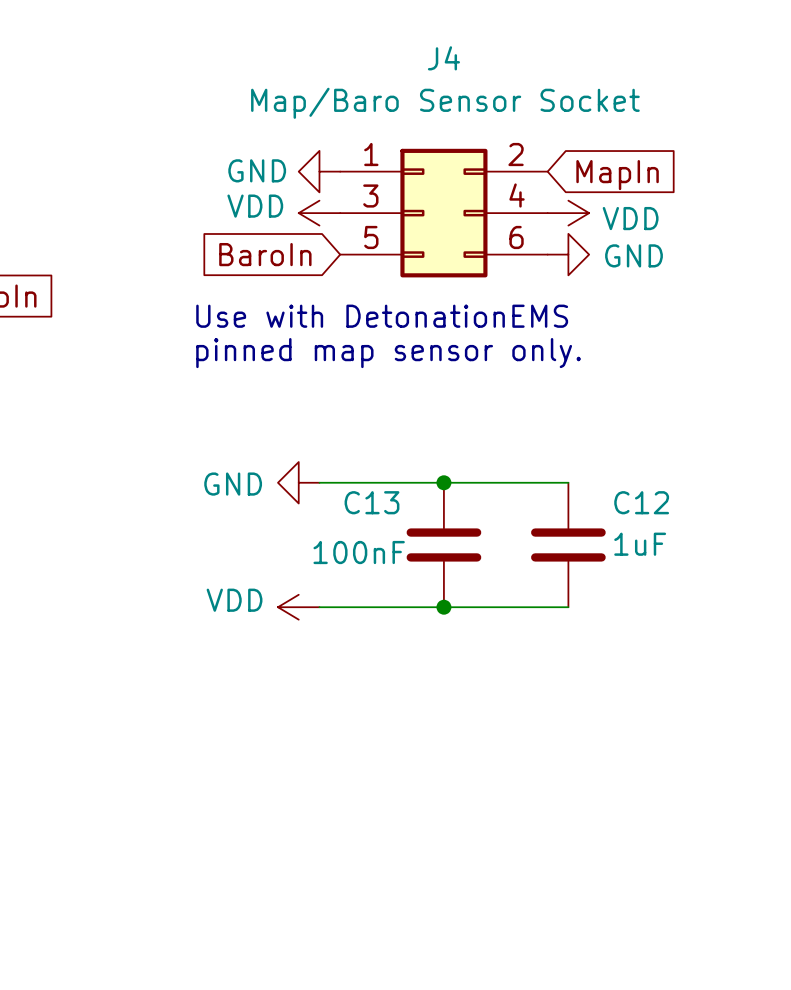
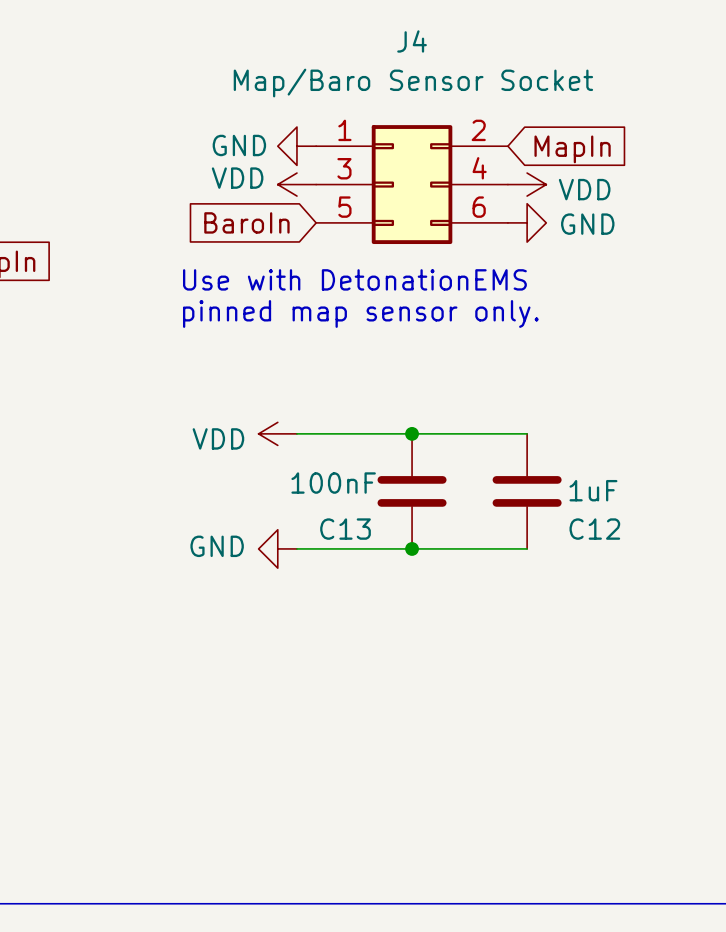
power symbol: GND (298, 482) -> VDD (277, 433)
C13 name position: C13 (371, 502) -> C13 (345, 529)
C12 name position: C12 (641, 502) -> C12 (594, 529)
C13 value position: 100nF (359, 552) -> 100nF (333, 483)
power symbol: VDD (298, 607) -> GND (277, 548)

